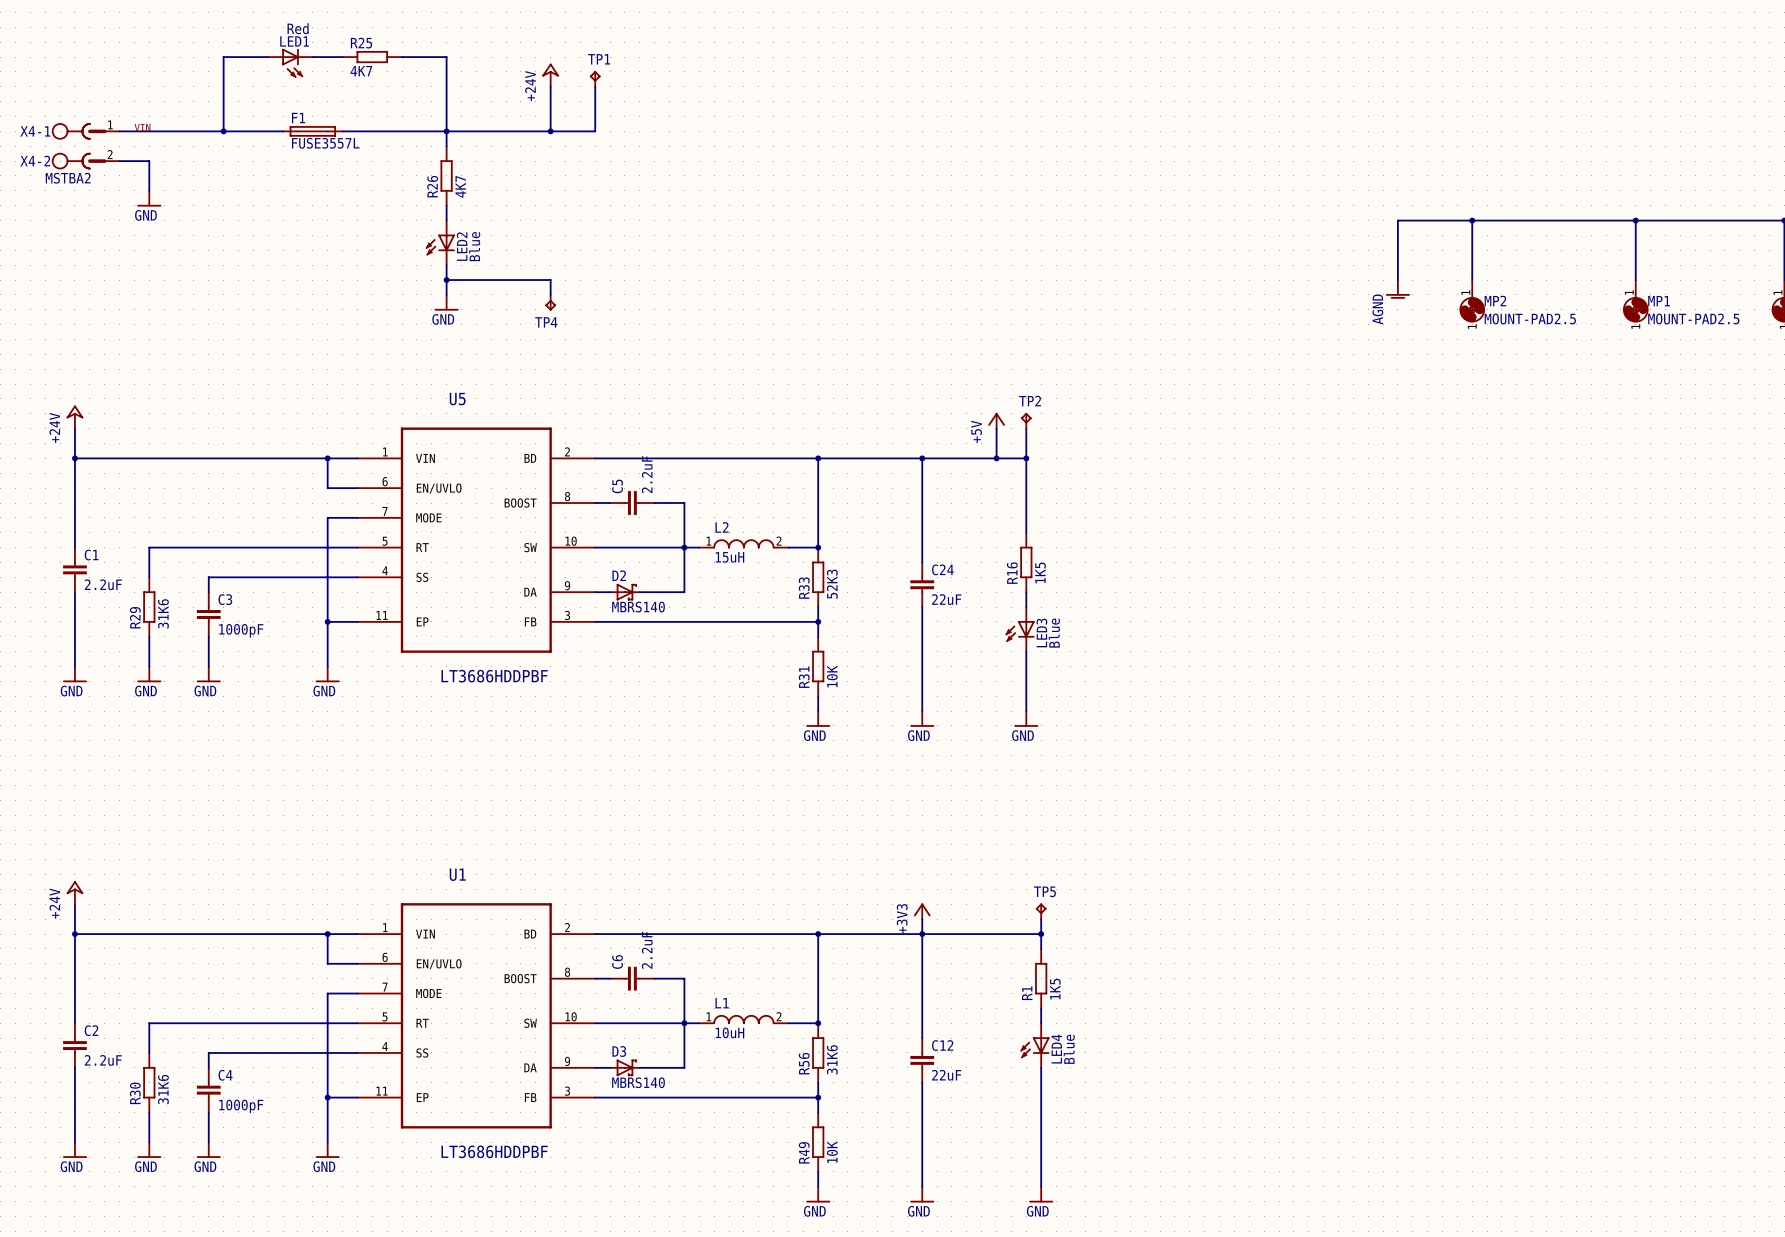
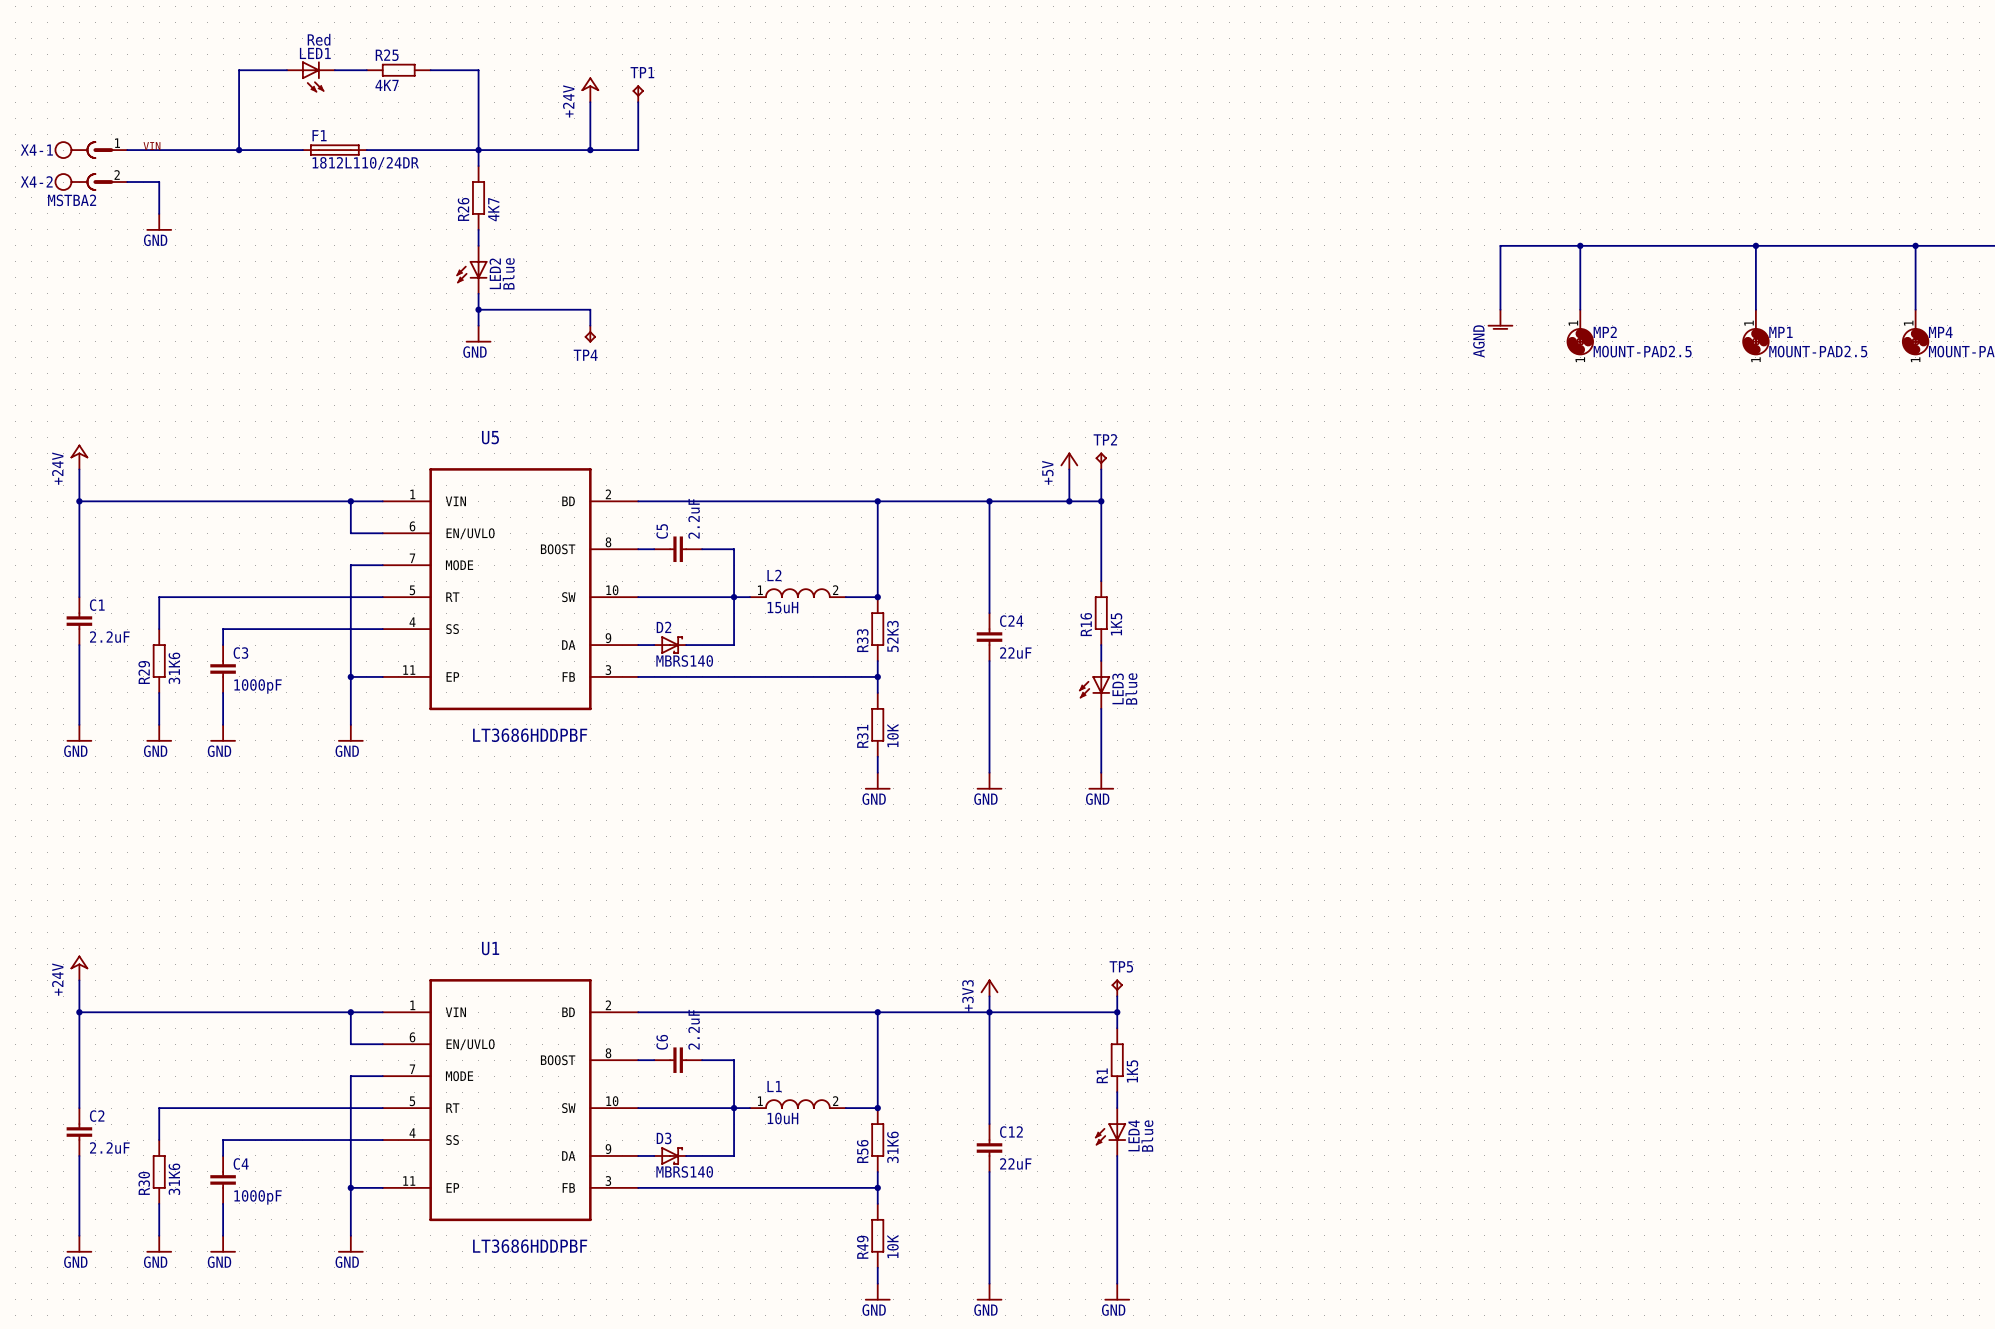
F1 value: FUSE3557L (325, 143) -> 1812L110/24DR (365, 163)

